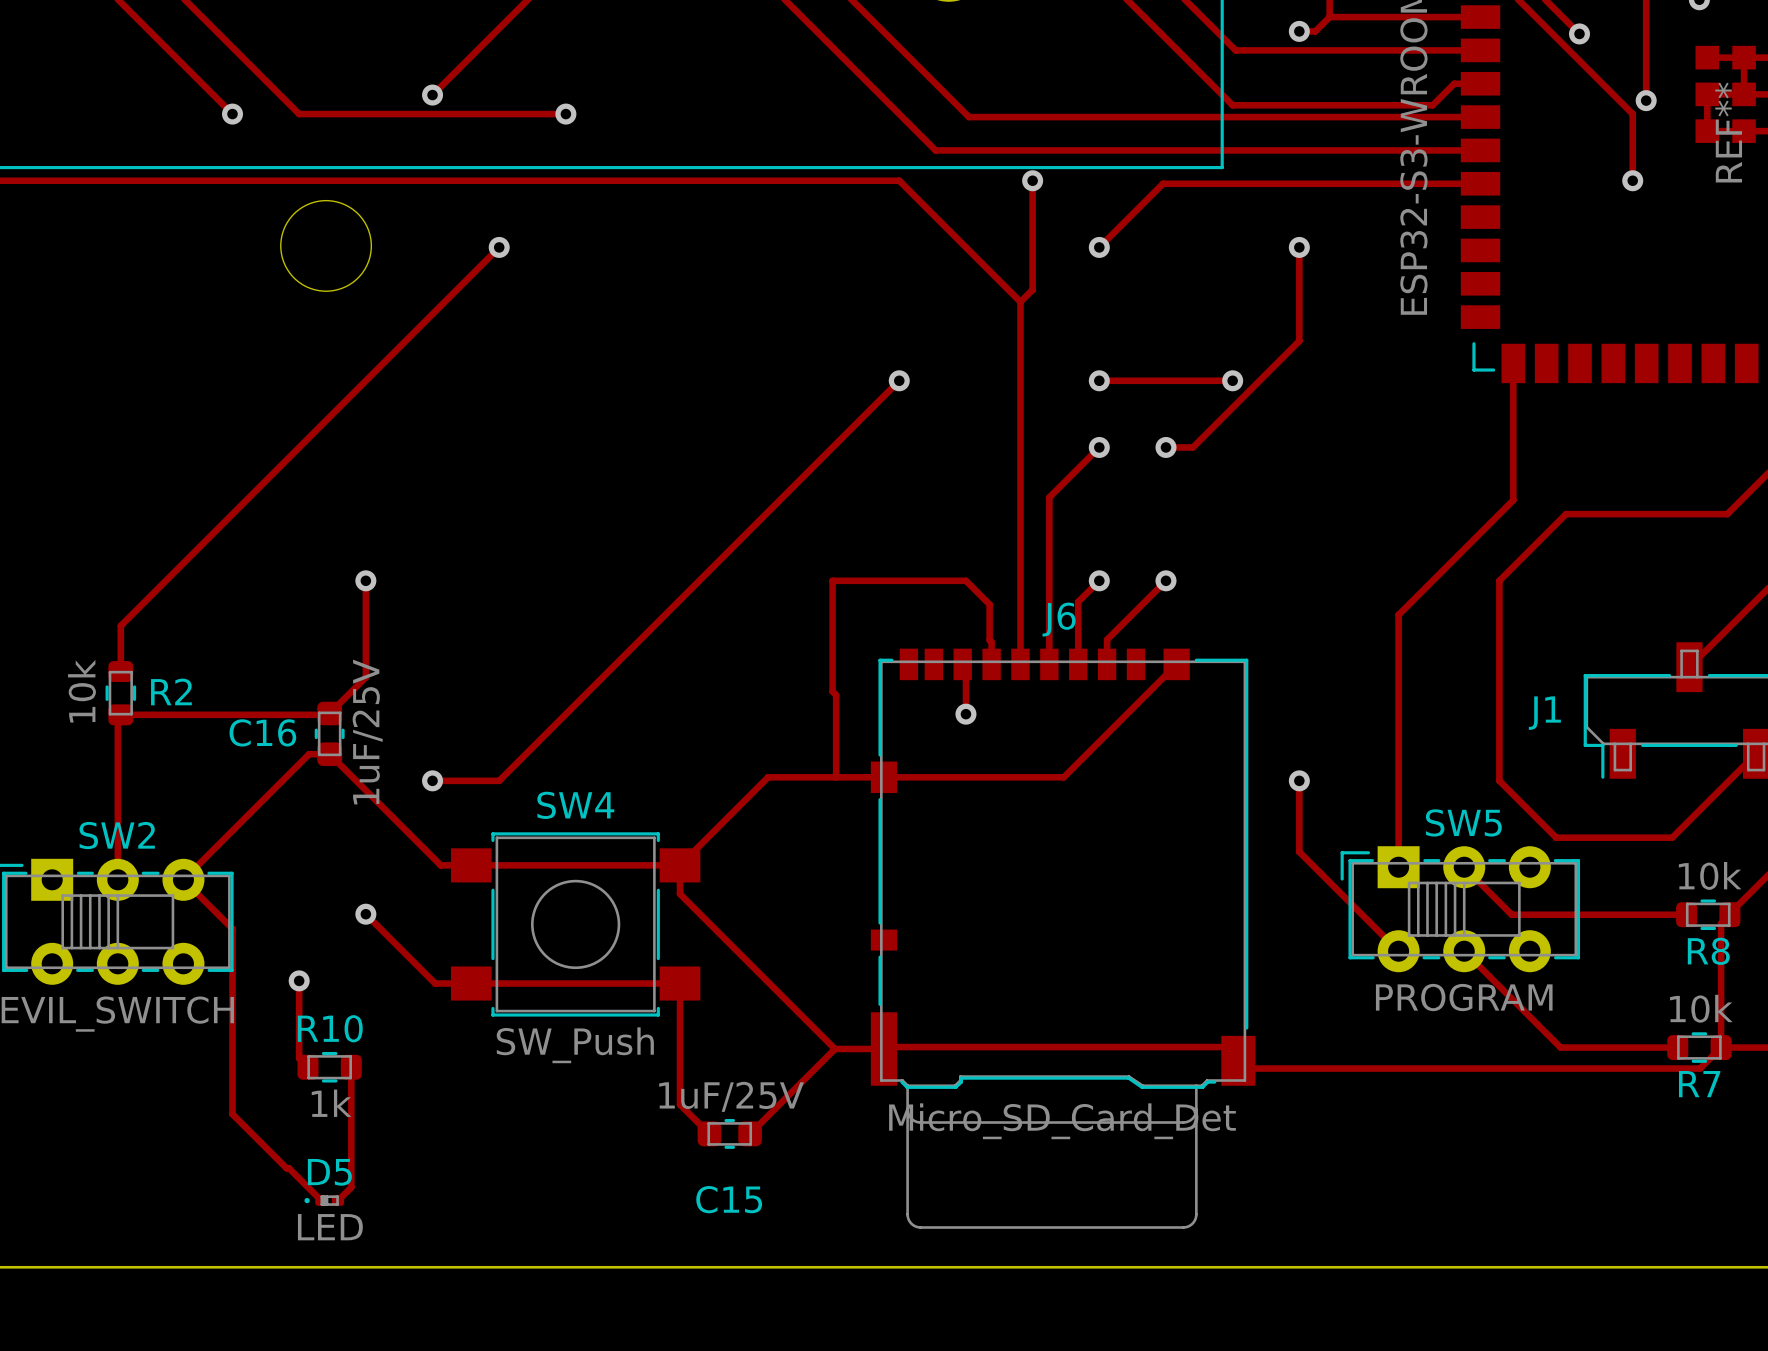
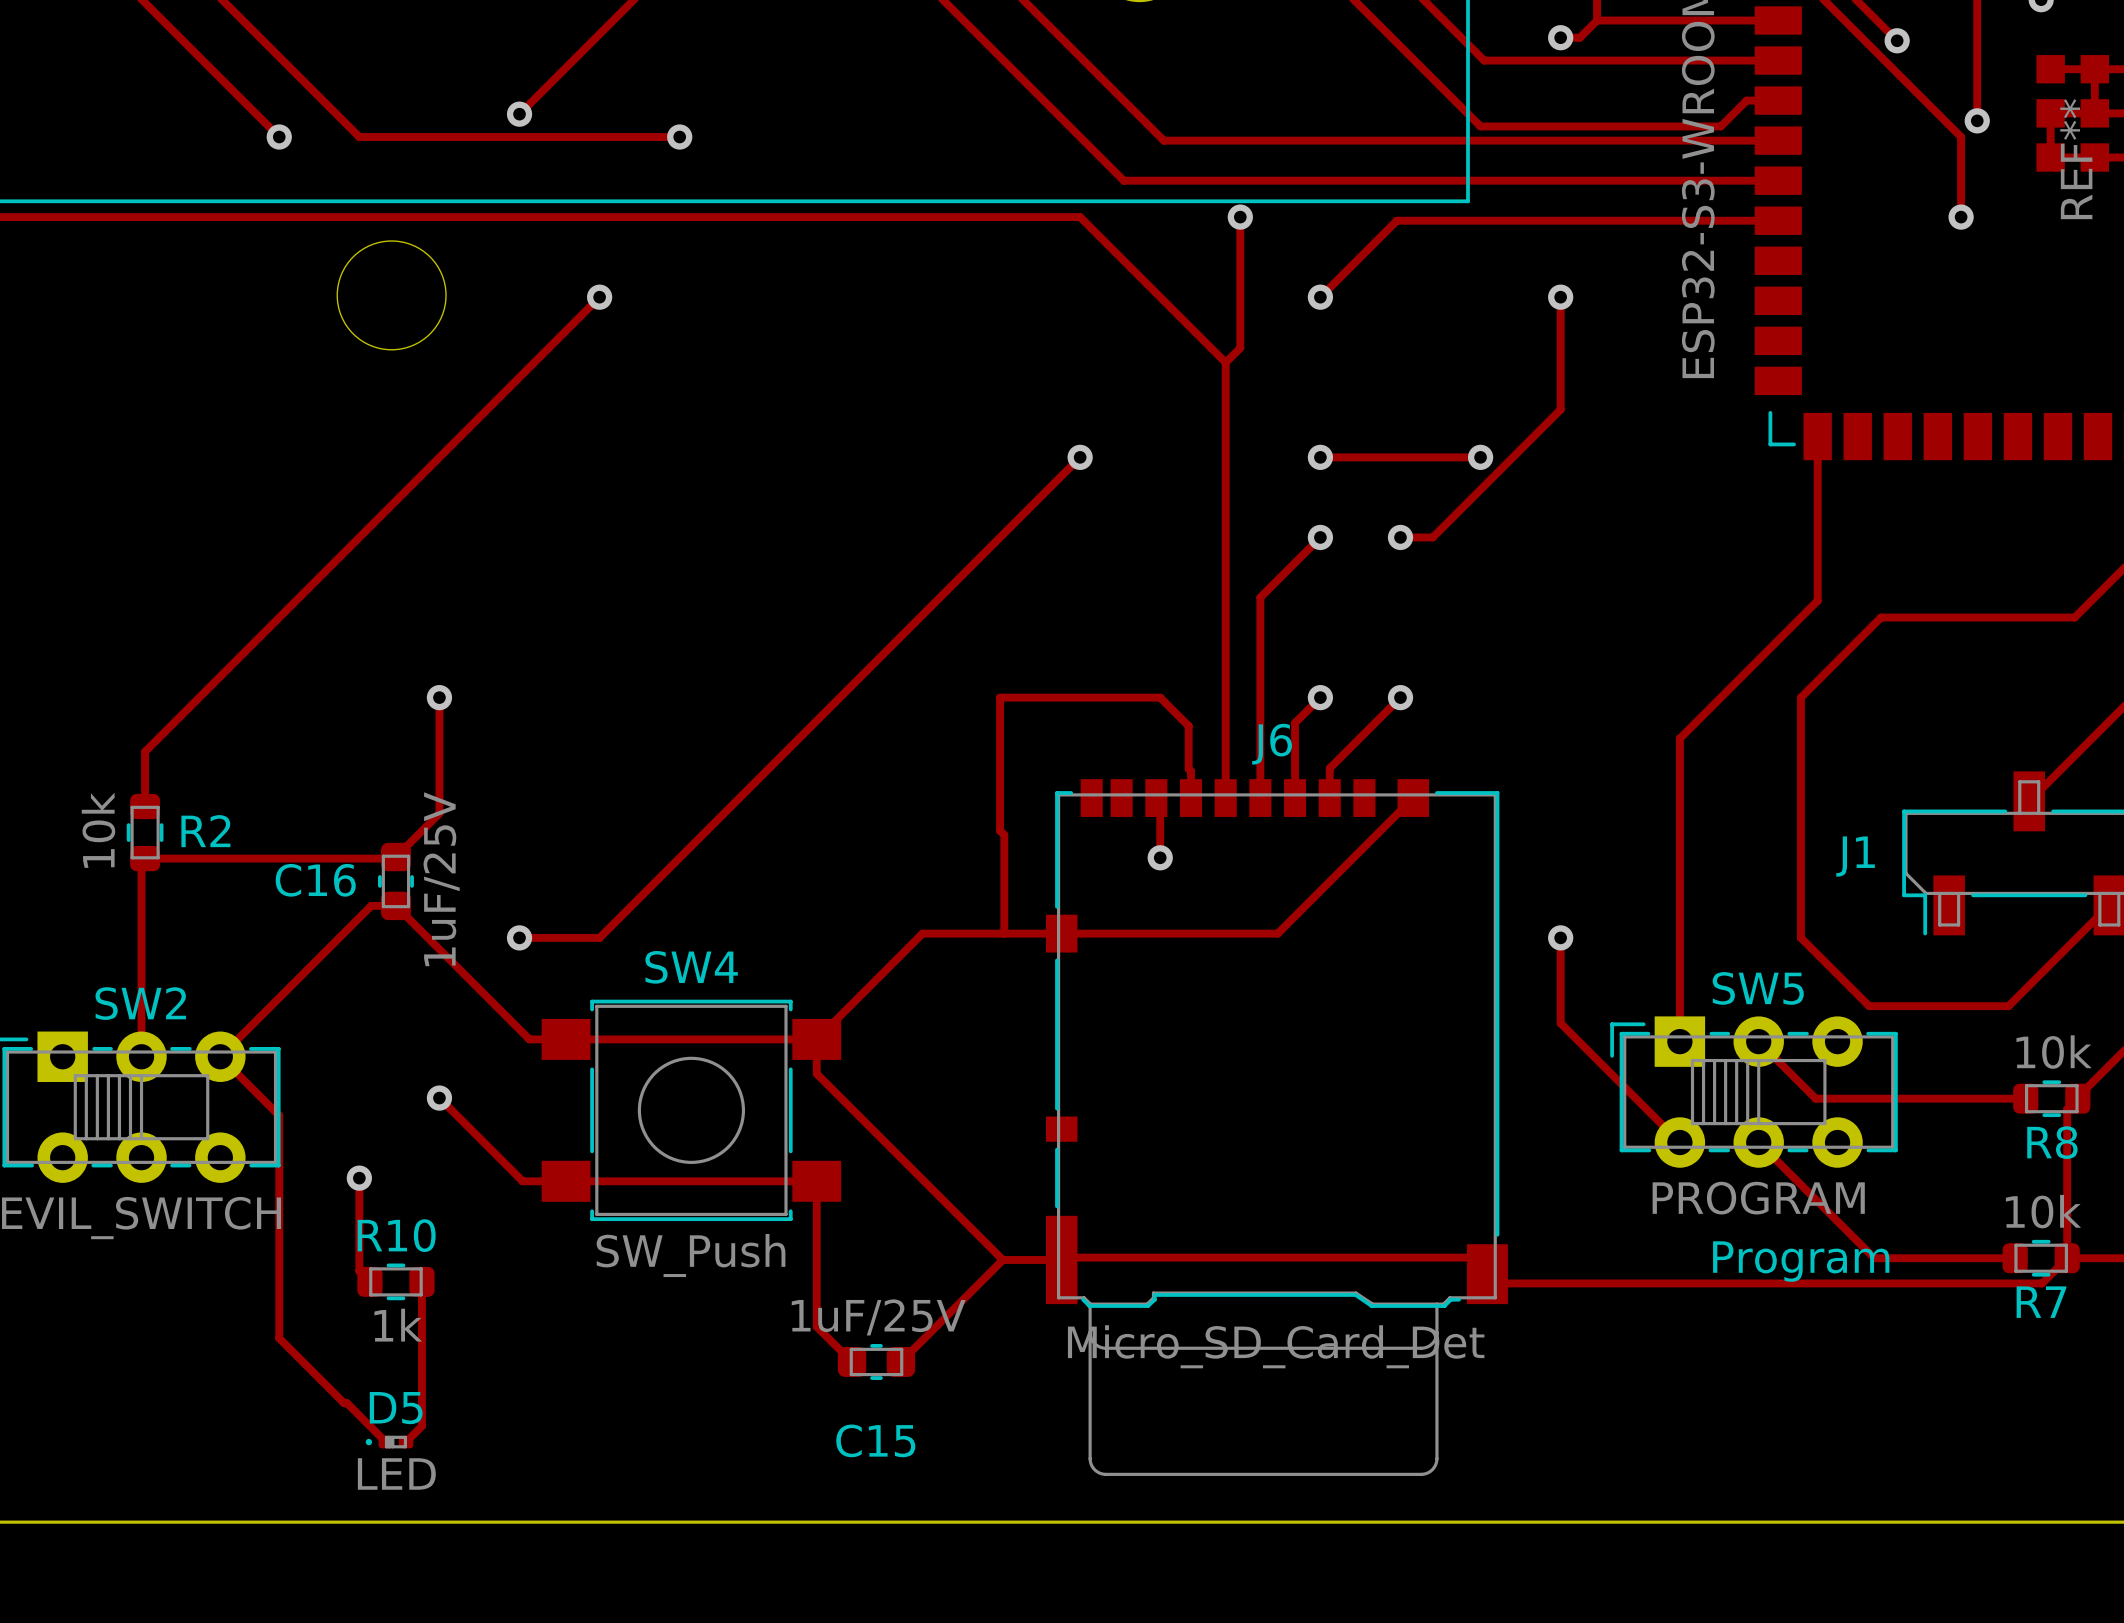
text: none -> Program (1801, 1261)

